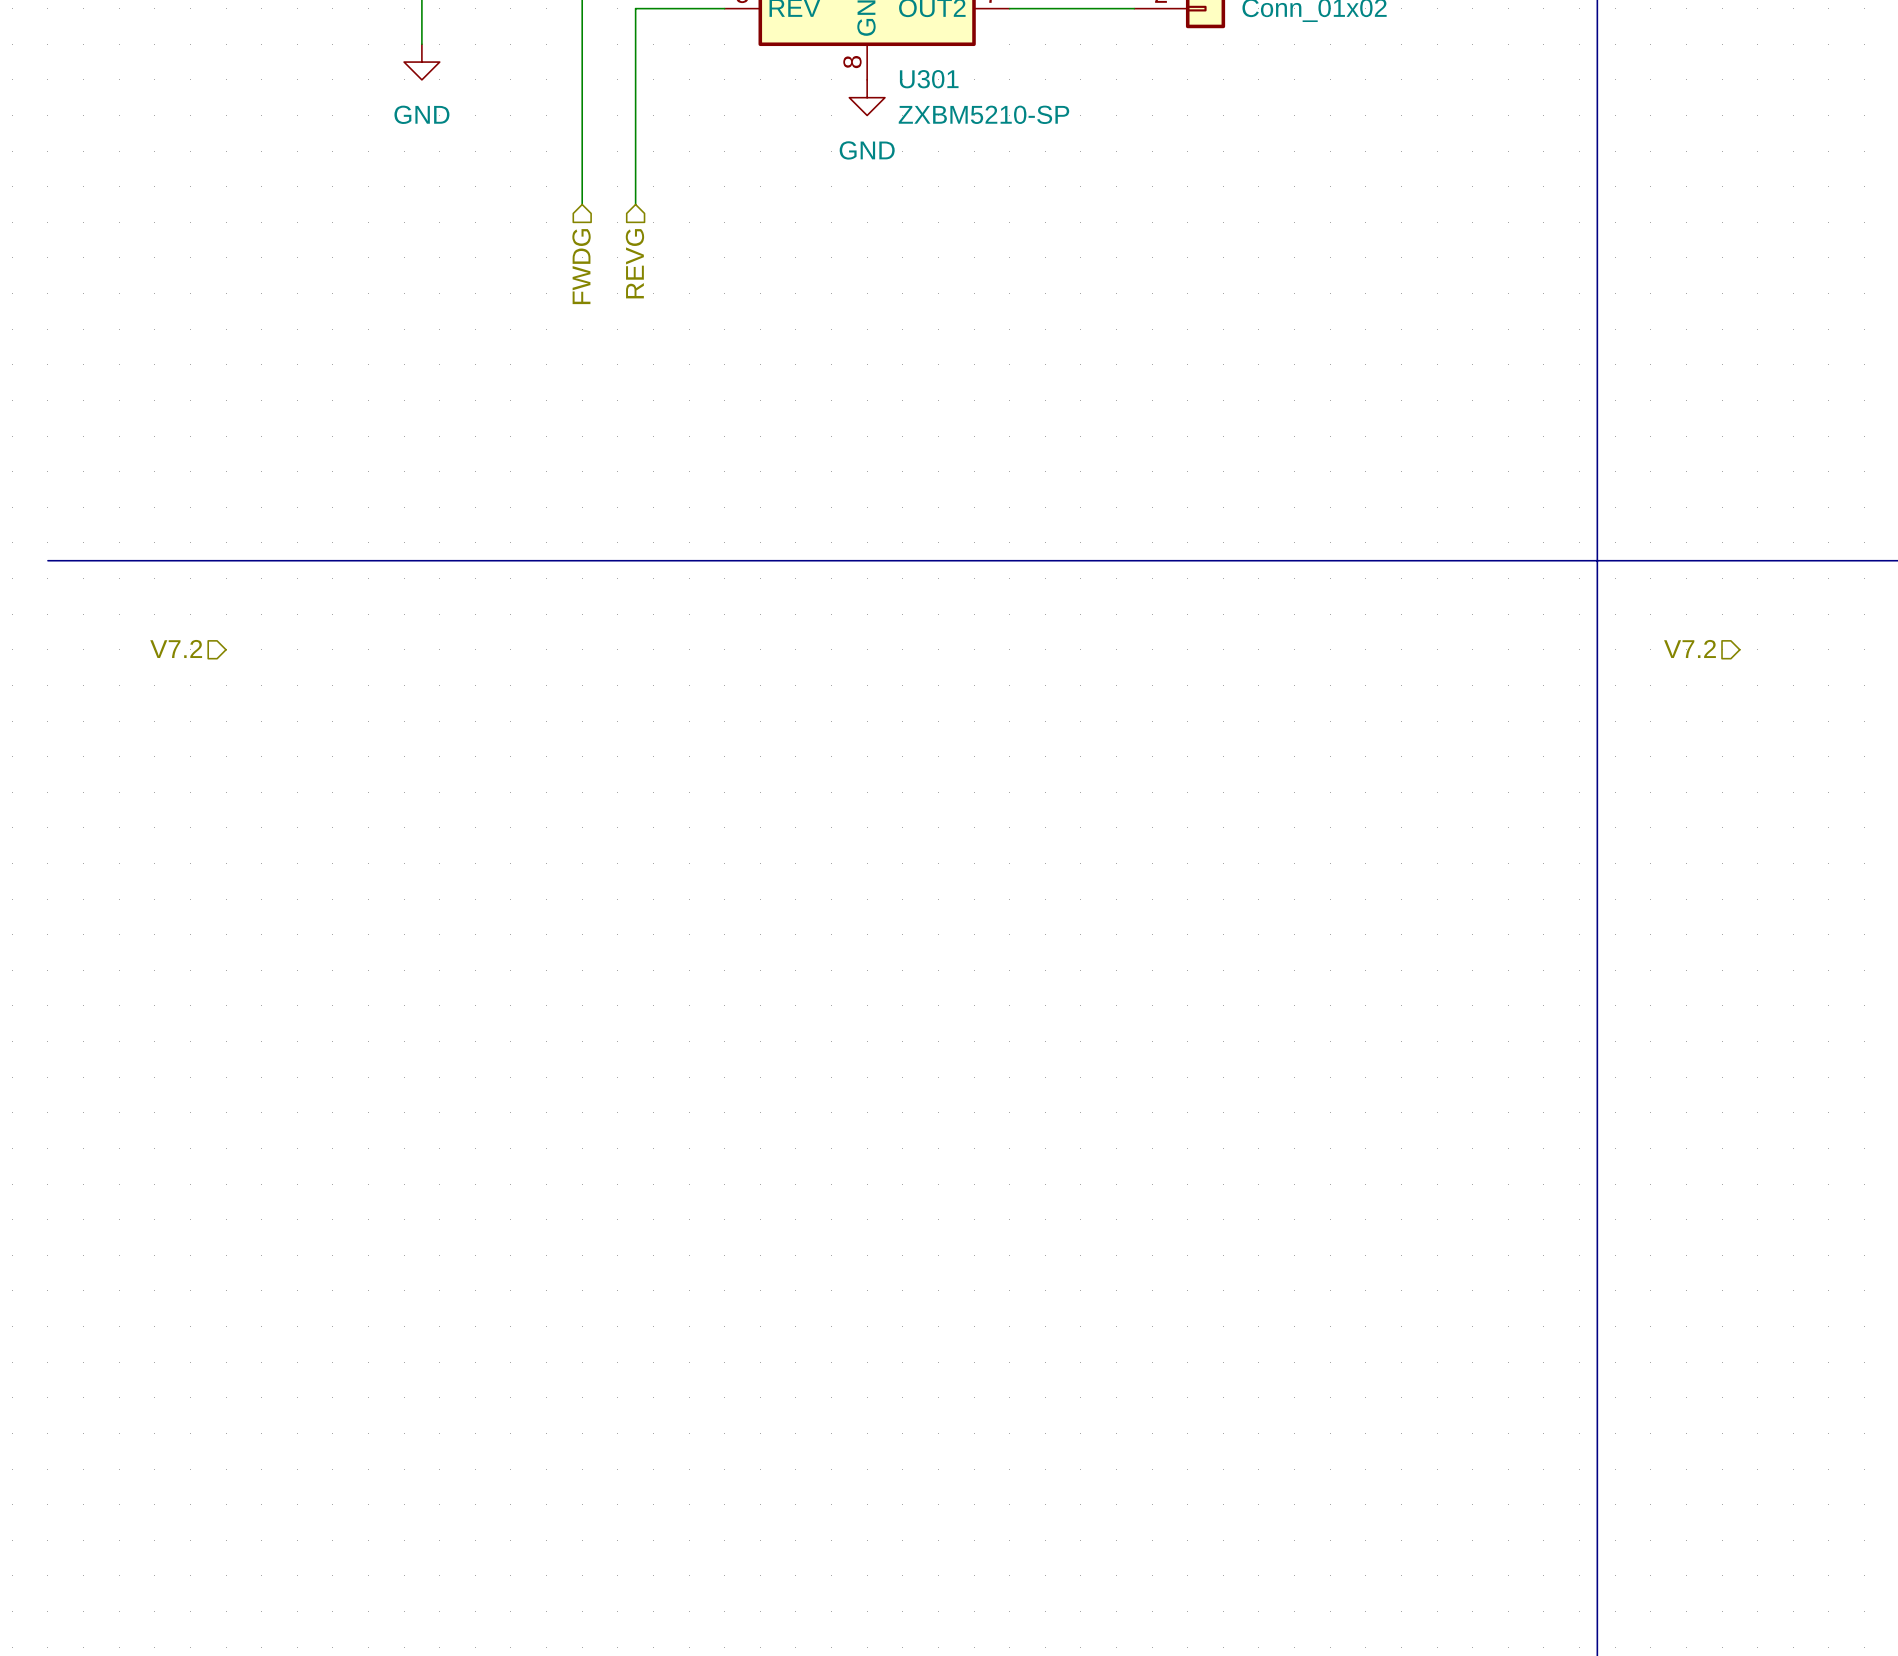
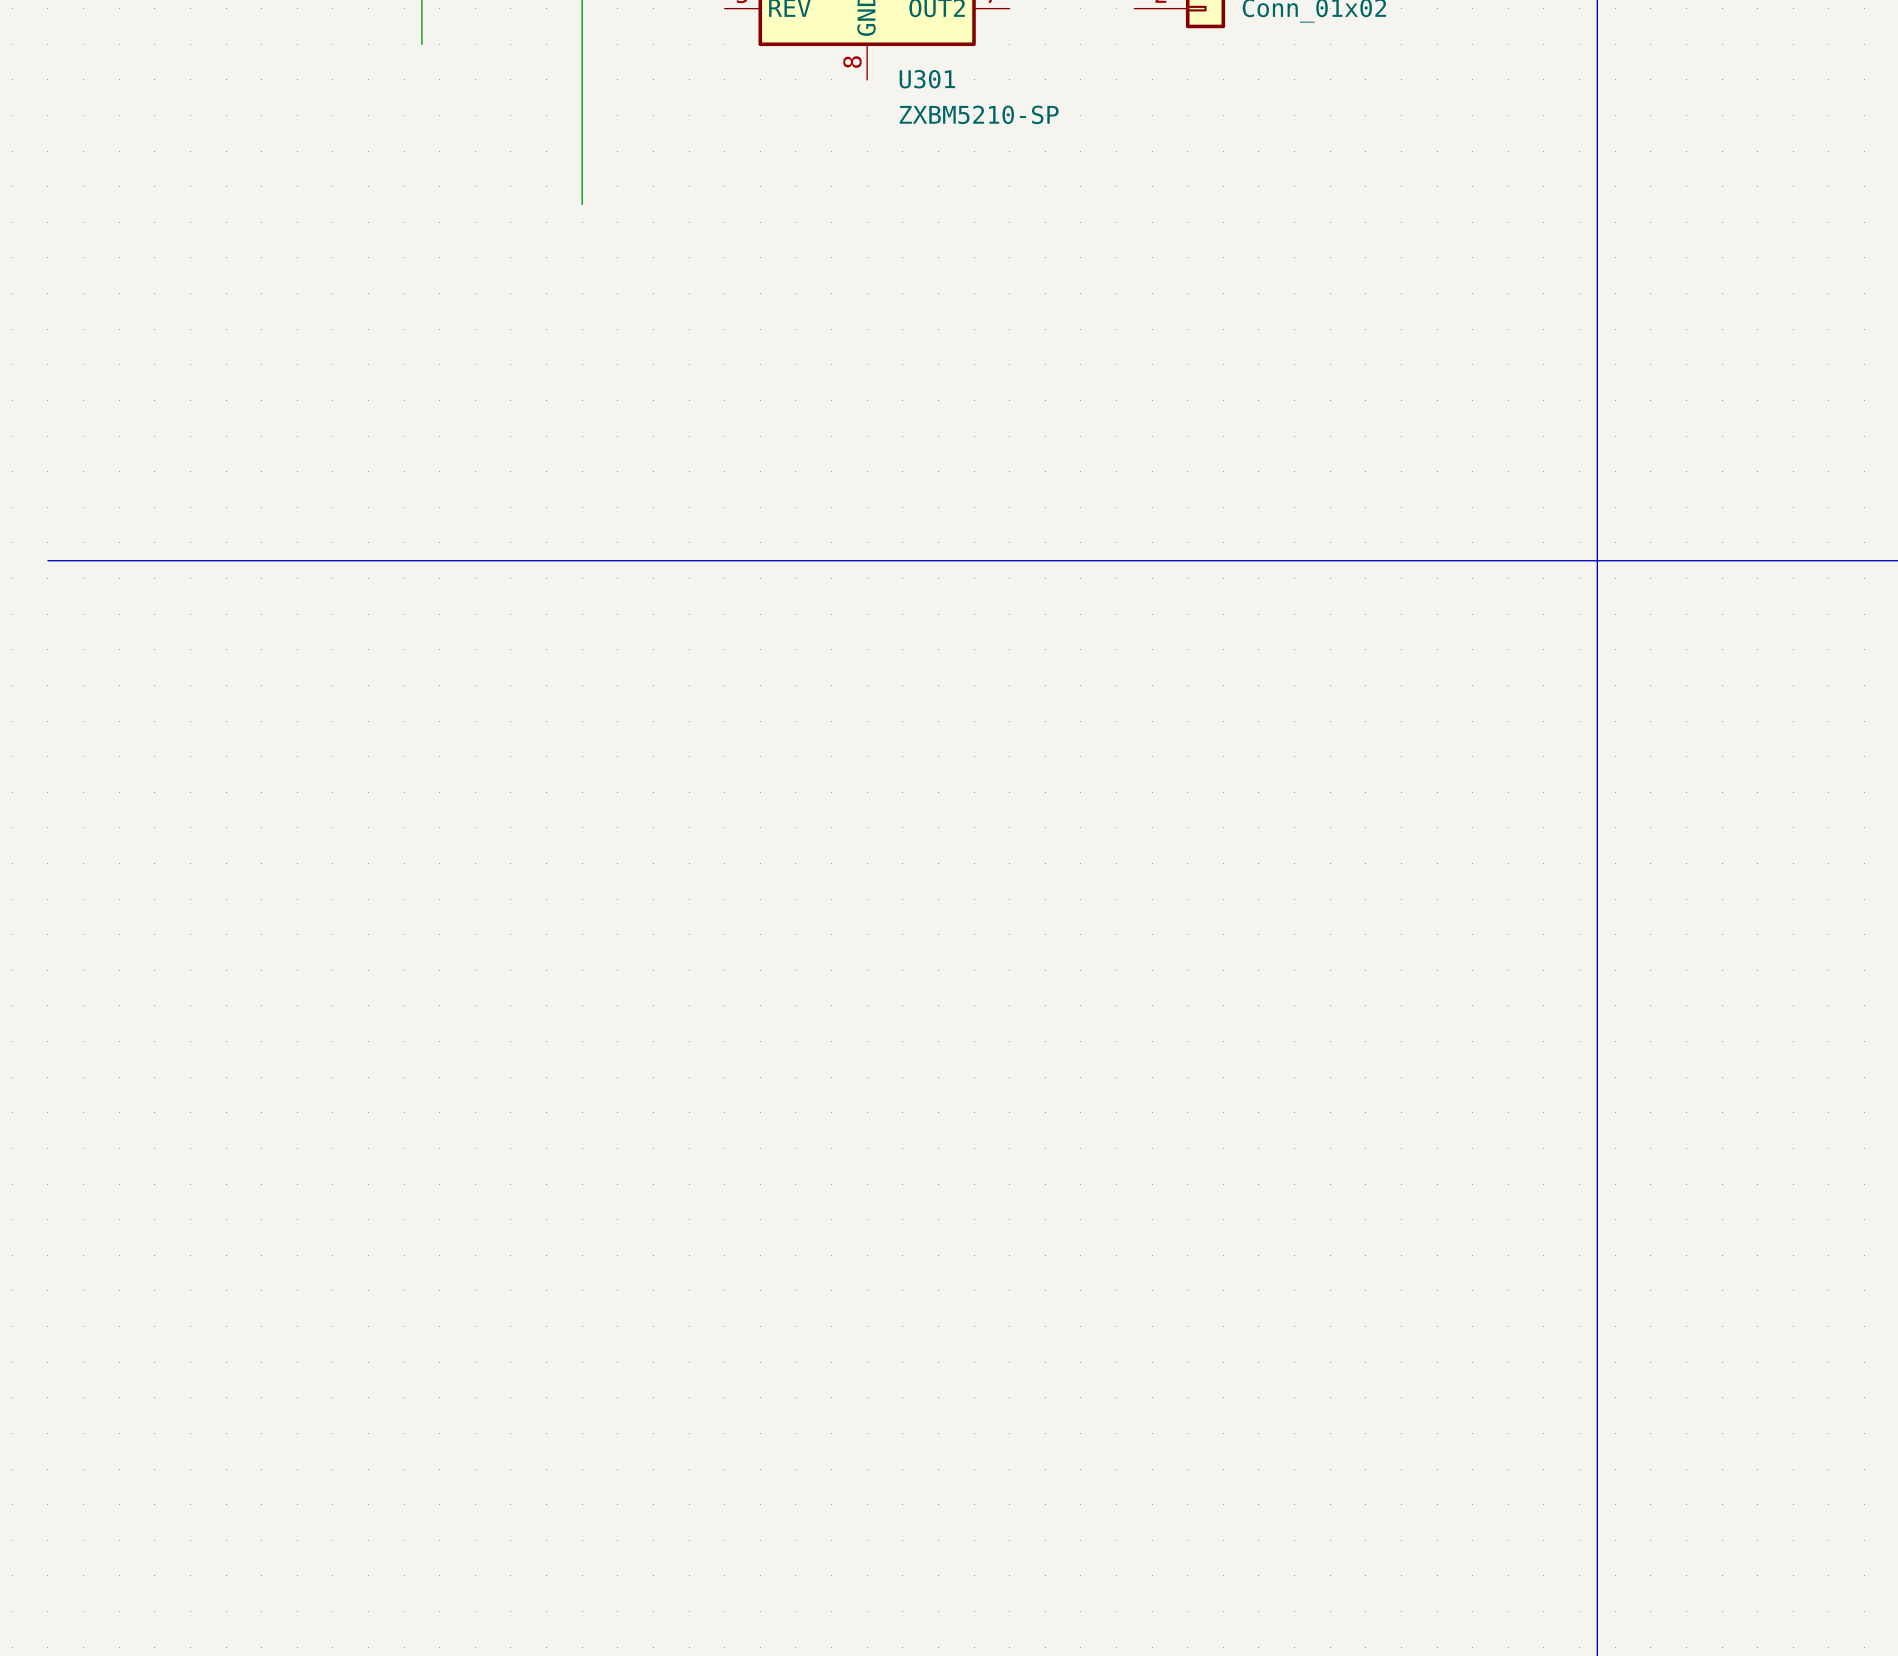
wire: (724, 8) (635, 8) (635, 204) -> none
wire: (1009, 8) (1134, 8) -> none
power symbol: GND (421, 62) -> none
power symbol: GND (867, 97) -> none
hierarchical label: REVG (634, 263) -> none
hierarchical label: FWDG (581, 266) -> none
hierarchical label: V7.2 (176, 648) -> none
hierarchical label: V7.2 (1689, 648) -> none

